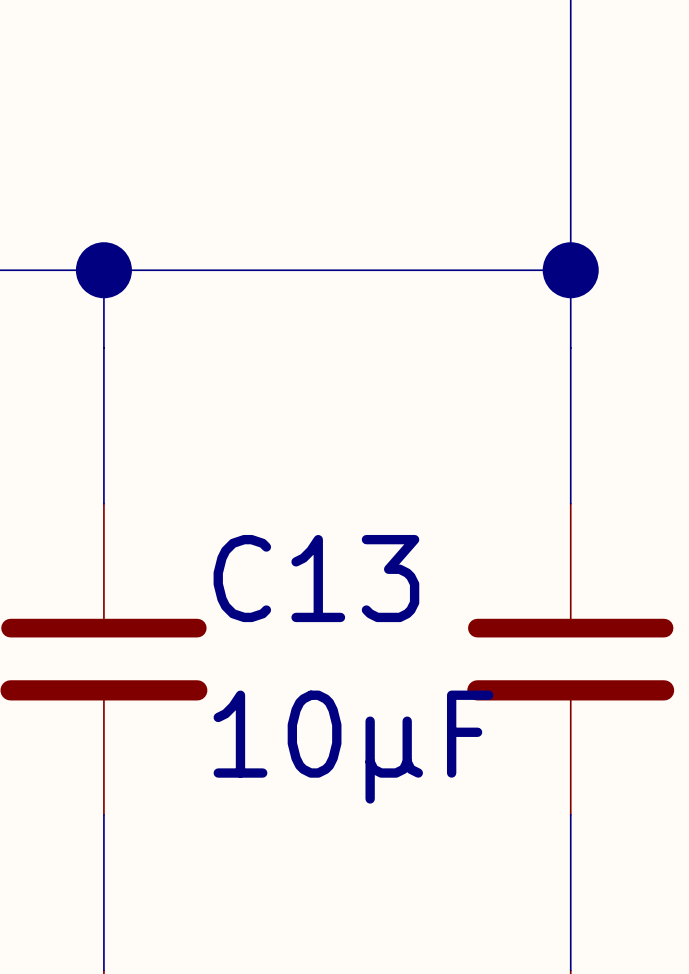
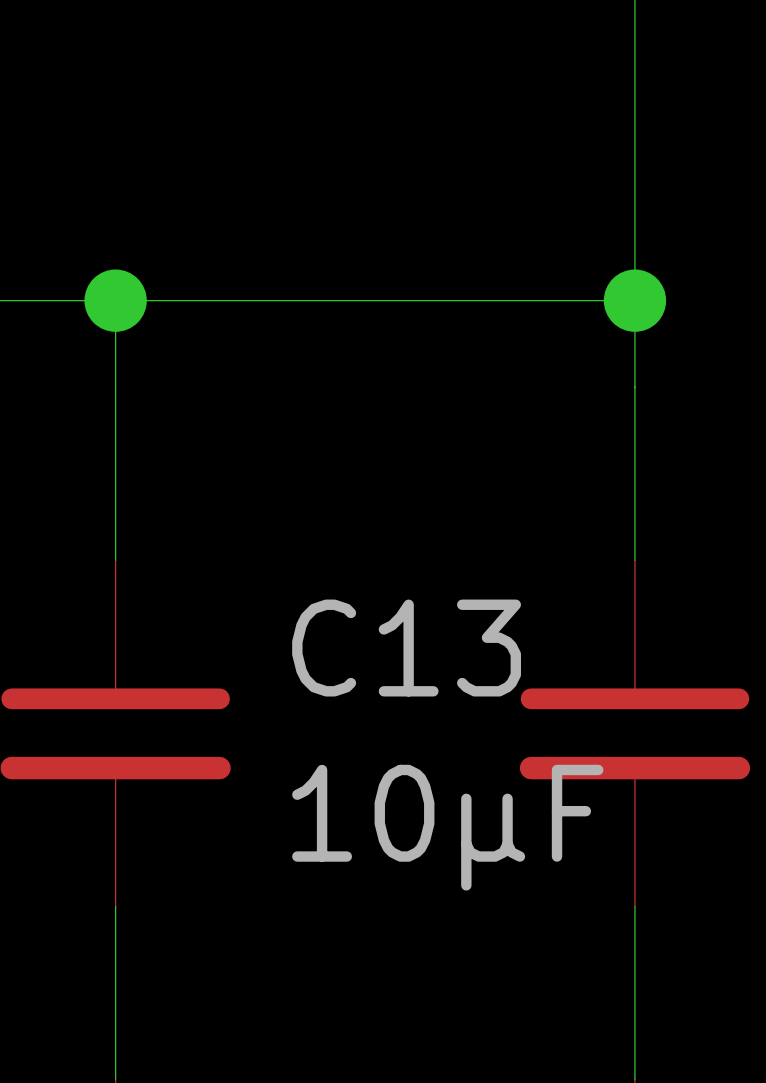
C13 name position: C13 (316, 578) -> C13 (406, 648)
C13 value position: 10µF (353, 747) -> 10µF (447, 827)

